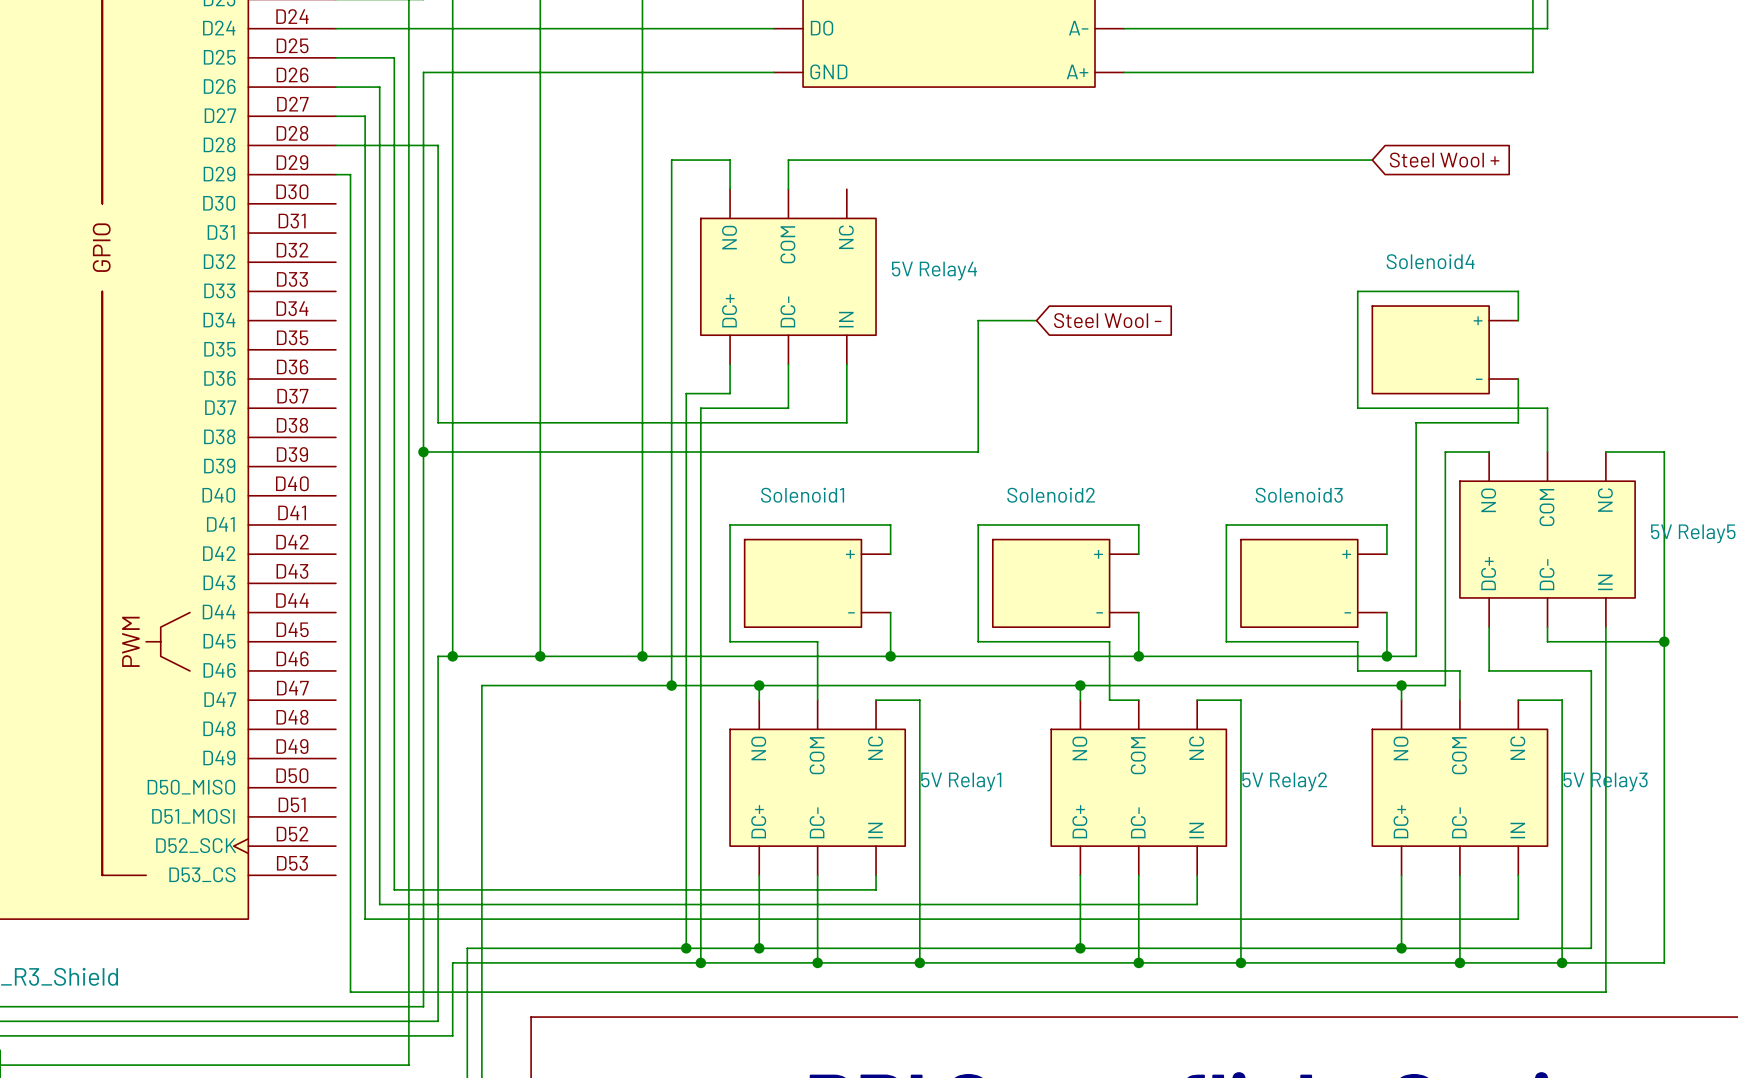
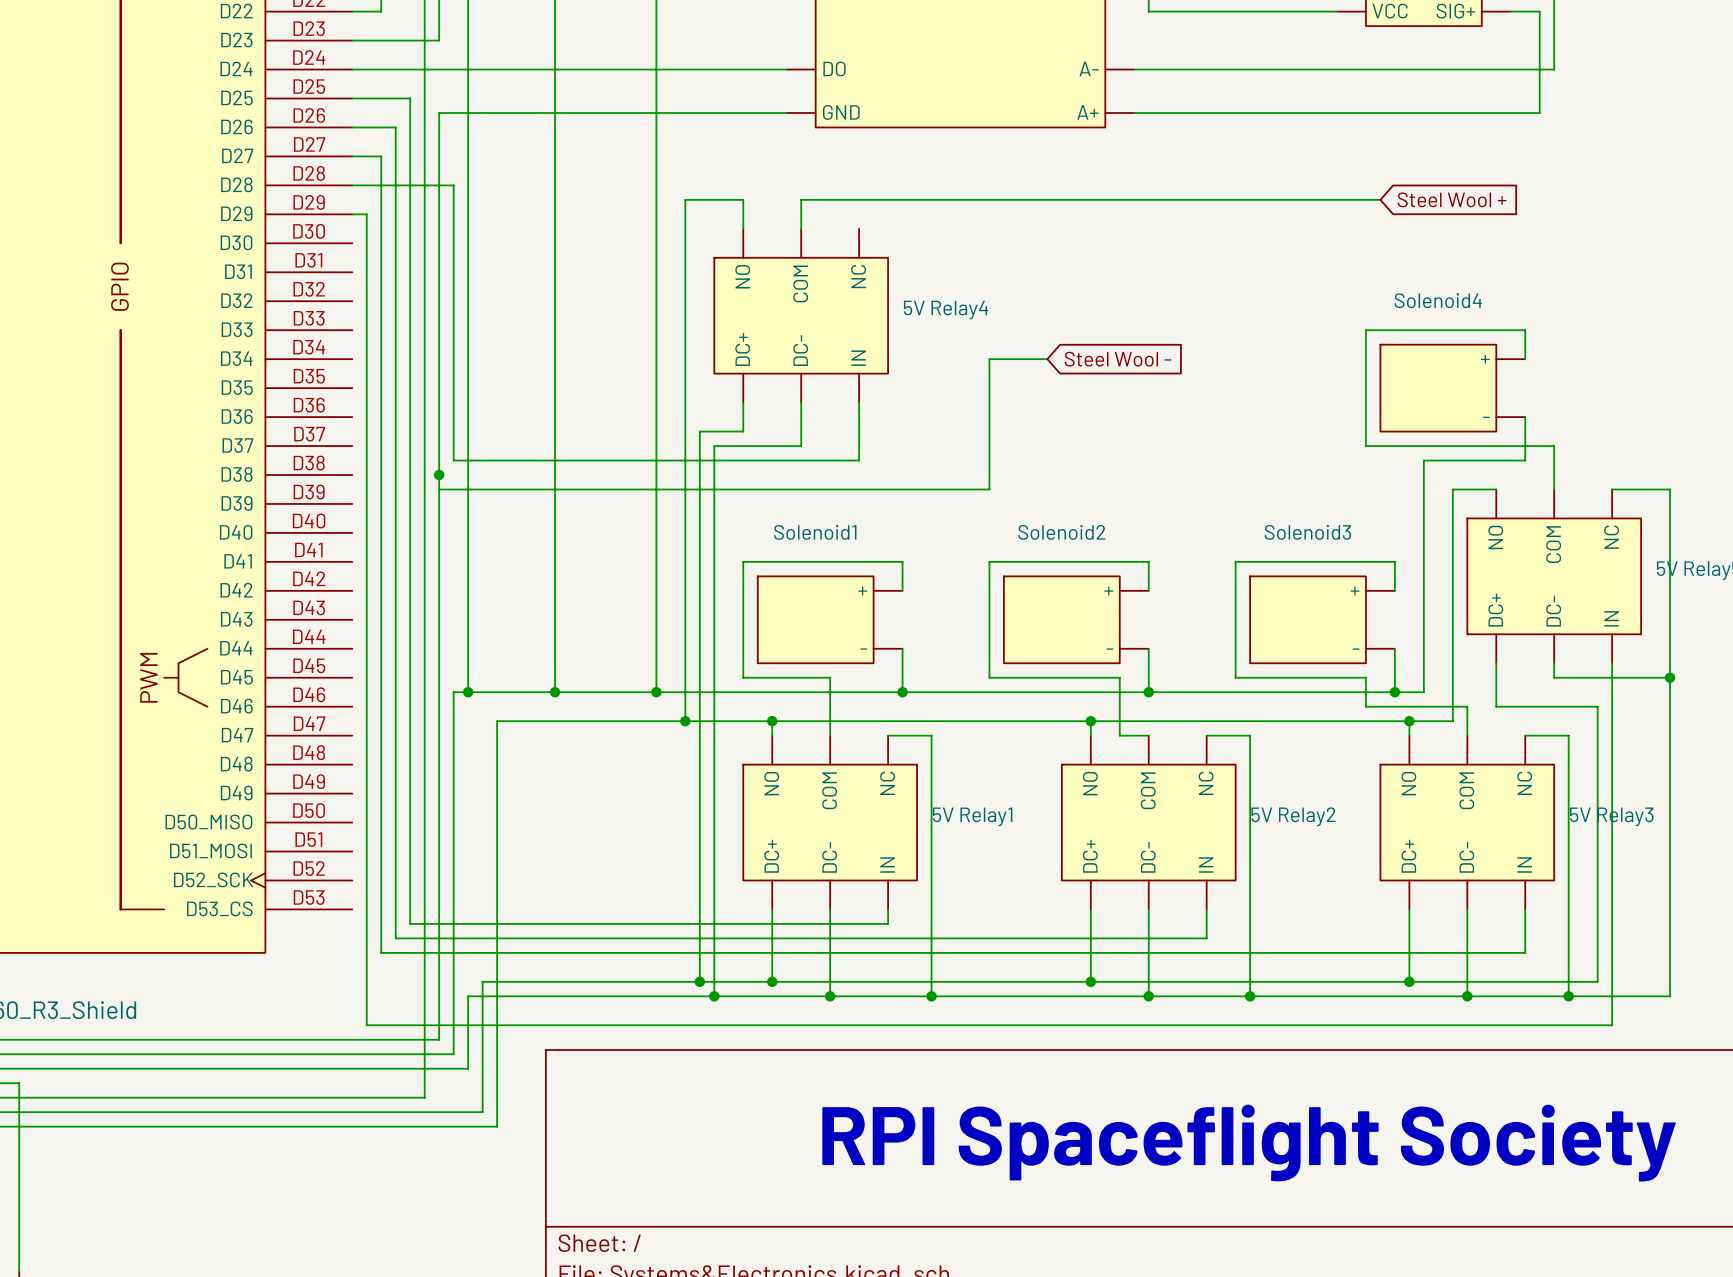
junction position: (423, 452) -> (439, 475)

